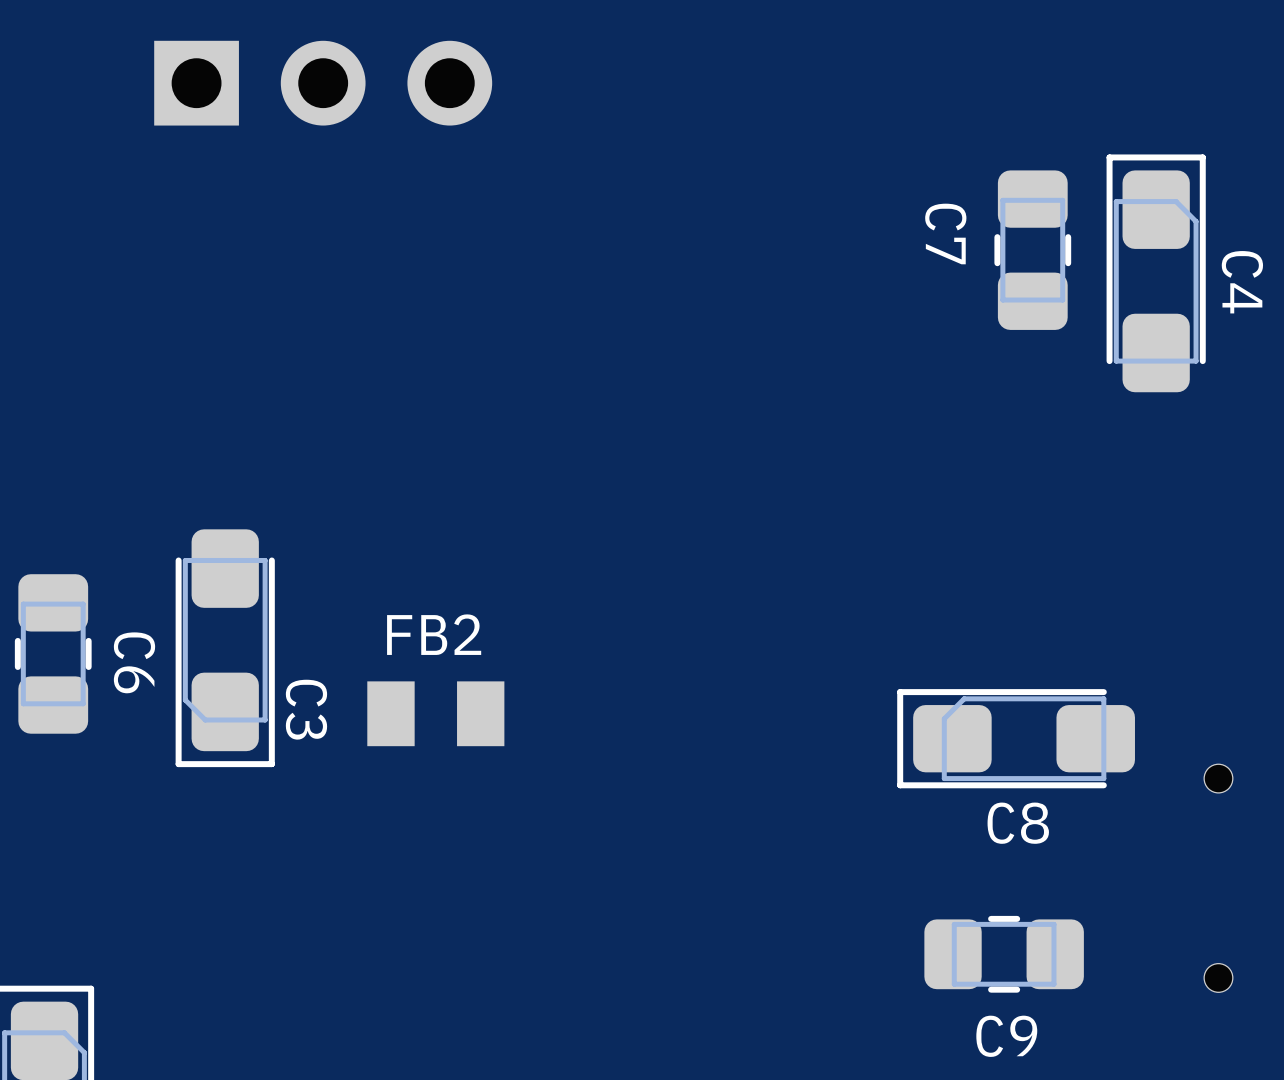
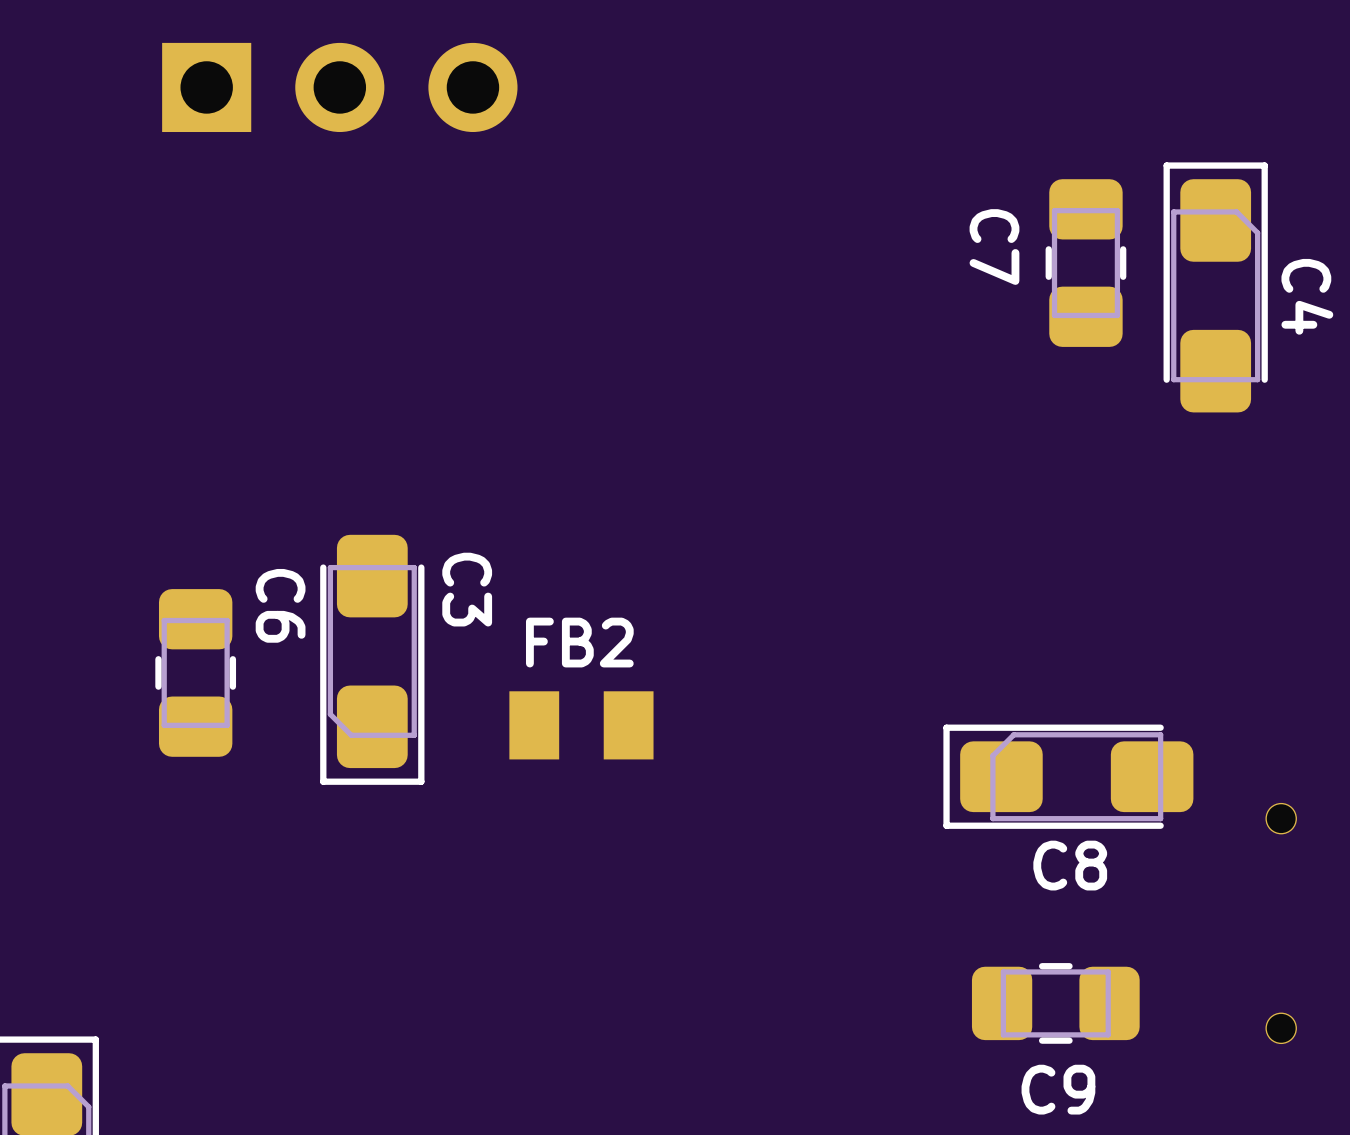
C3 position: (225, 648) -> (372, 659)
C6 position: (53, 653) -> (195, 672)
C6 name position: C6 (134, 662) -> C6 (280, 605)
C3 name position: C3 (306, 709) -> C3 (467, 589)
FB2 position: (435, 713) -> (581, 725)

